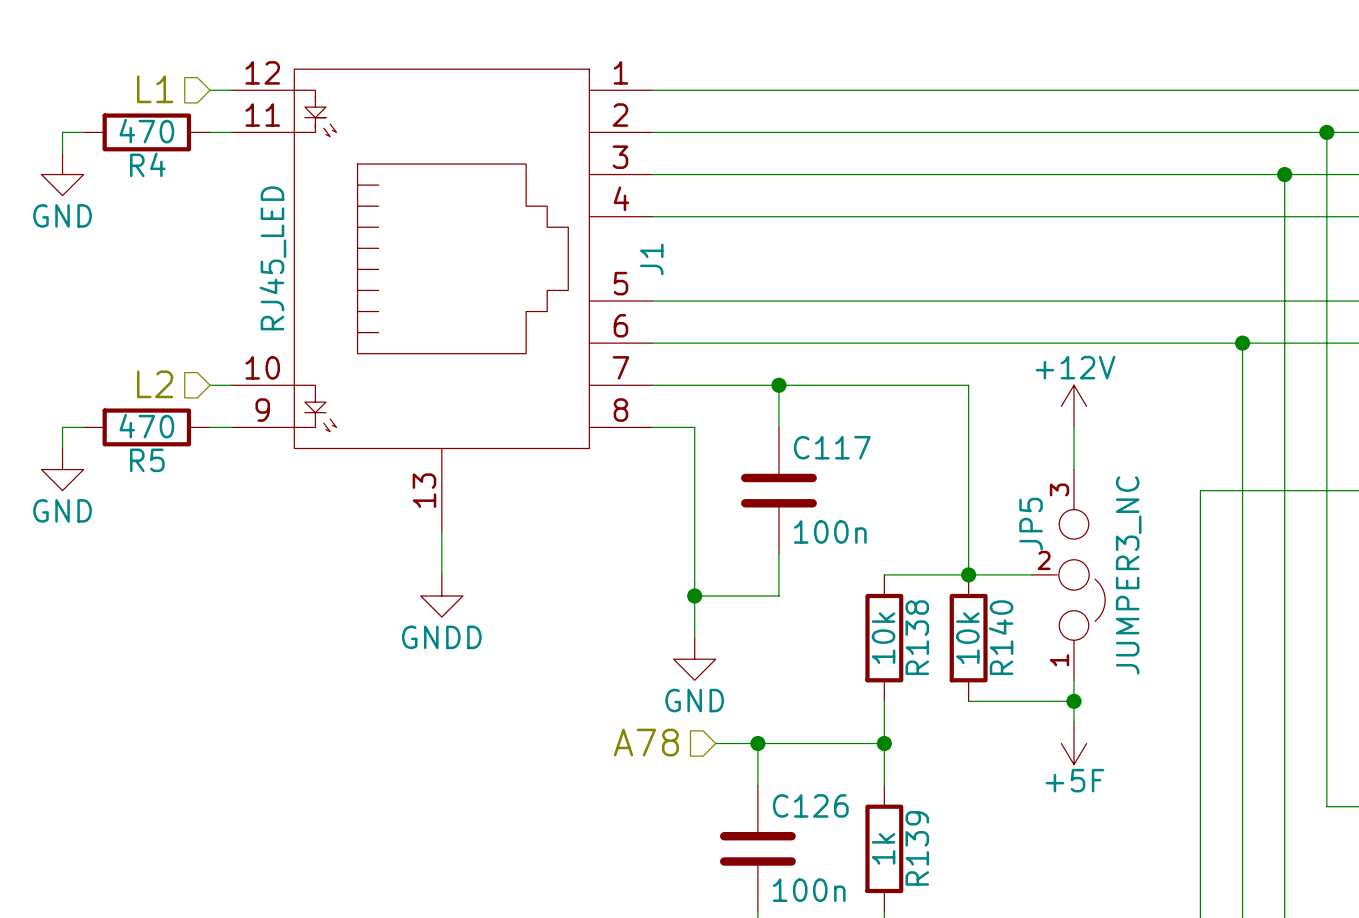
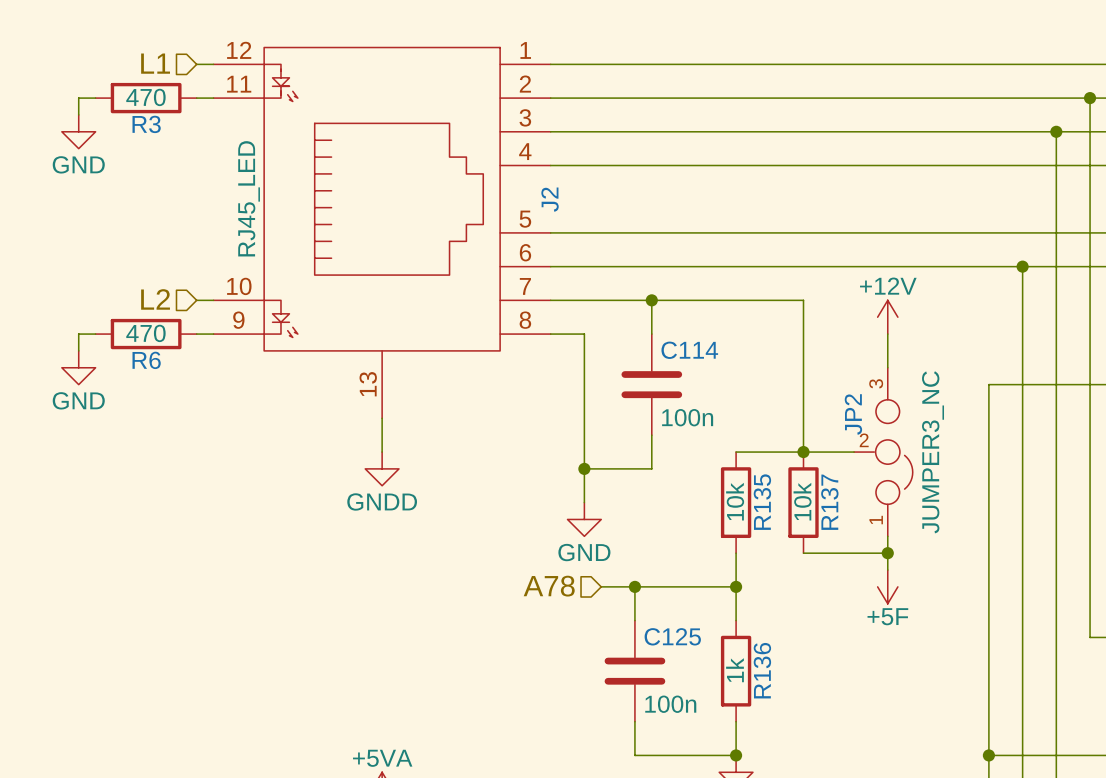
R4 name: R4 (147, 164) -> R3 (146, 124)
J1 name: J1 (651, 259) -> J2 (550, 199)
C117 name: C117 (832, 447) -> C114 (689, 350)
R5 name: R5 (147, 460) -> R6 (146, 360)
JP5 name: JP5 (1031, 524) -> JP2 (853, 414)
R138 name: R138 (917, 637) -> R135 (762, 502)
R140 name: R140 (1001, 637) -> R137 (829, 502)
C126 name: C126 (810, 805) -> C125 (672, 636)
R139 name: R139 (917, 848) -> R136 (762, 670)

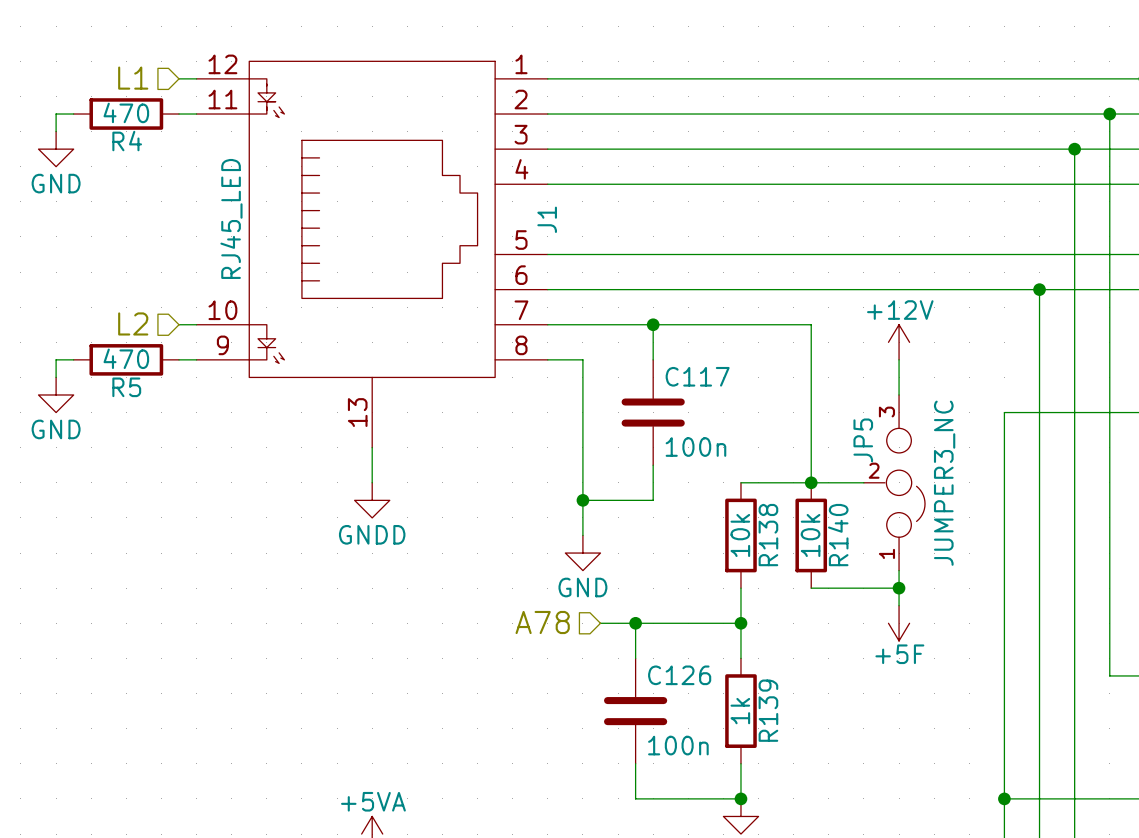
R3 name: R3 (146, 124) -> R4 (127, 141)
J2 name: J2 (550, 199) -> J1 (547, 219)
C114 name: C114 (689, 350) -> C117 (697, 376)
R6 name: R6 (146, 360) -> R5 (126, 387)
JP2 name: JP2 (853, 414) -> JP5 (863, 440)
R135 name: R135 (762, 502) -> R138 (768, 535)
R137 name: R137 (829, 502) -> R140 (838, 535)
C125 name: C125 (672, 636) -> C126 (679, 675)
R136 name: R136 (762, 670) -> R139 (768, 710)

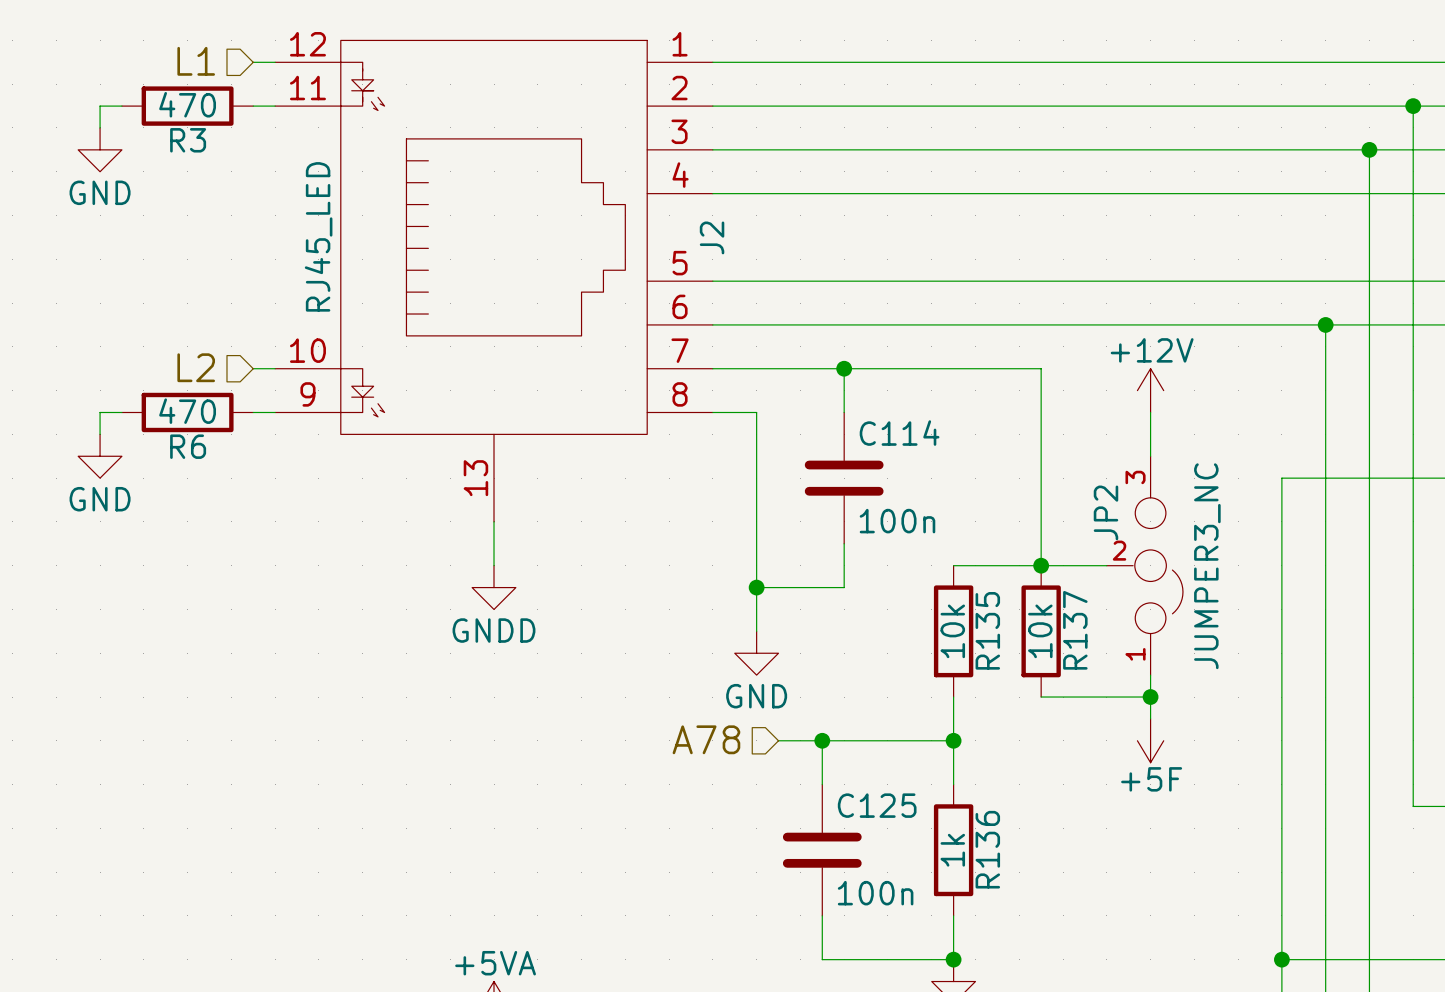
R4 name: R4 (127, 141) -> R3 (188, 140)
J1 name: J1 (547, 219) -> J2 (712, 237)
C117 name: C117 (697, 376) -> C114 (899, 433)
R5 name: R5 (126, 387) -> R6 (188, 446)
JP5 name: JP5 (863, 440) -> JP2 (1105, 512)
R138 name: R138 (768, 535) -> R135 (987, 630)
R140 name: R140 (838, 535) -> R137 (1075, 630)
C126 name: C126 (679, 675) -> C125 (877, 805)
R139 name: R139 (768, 710) -> R136 (987, 849)

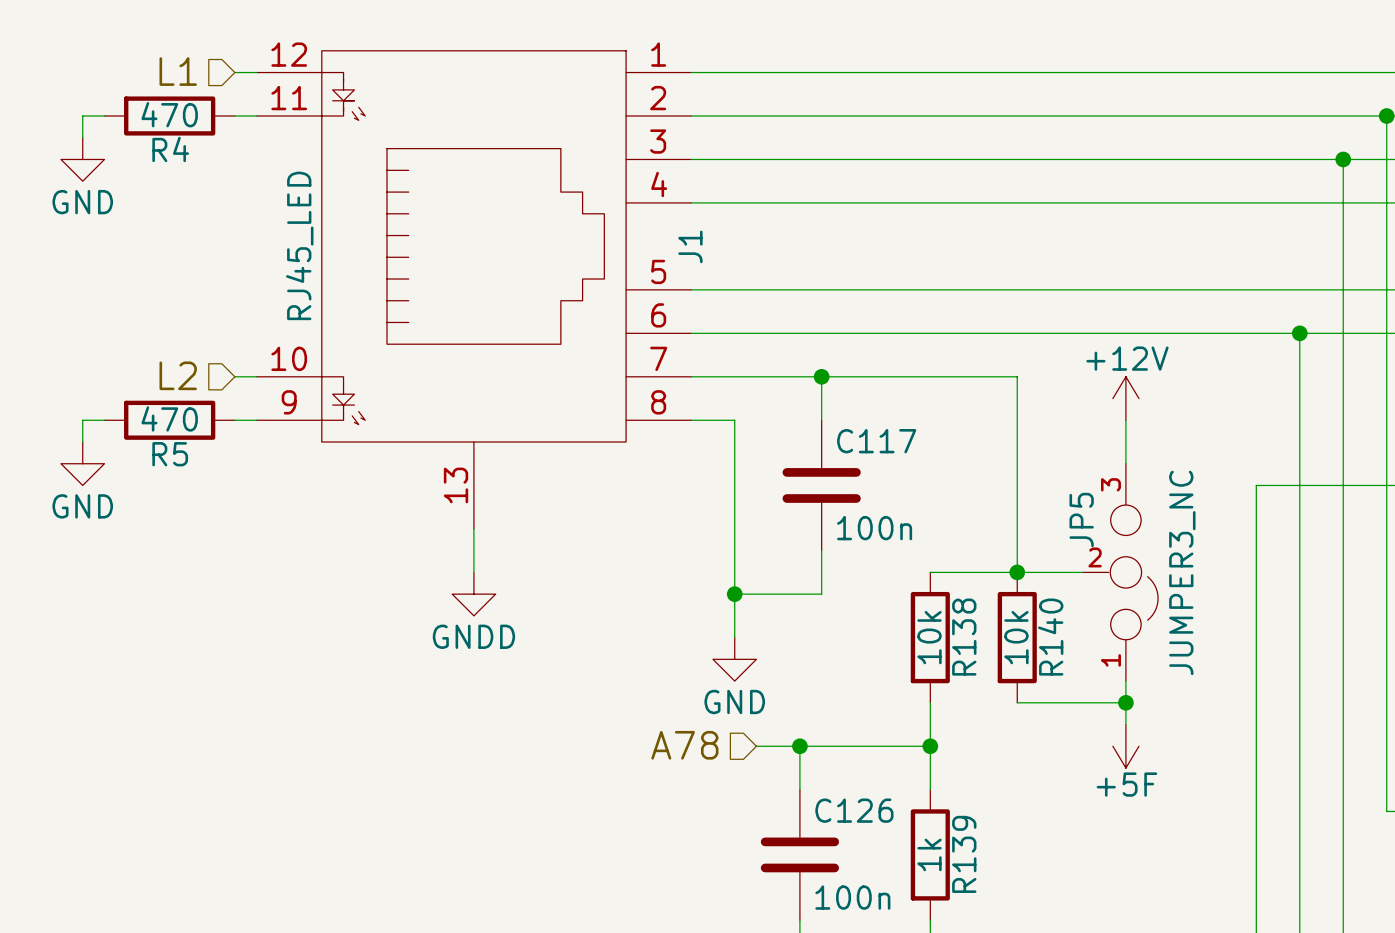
R3 name: R3 (188, 140) -> R4 (170, 149)
J2 name: J2 (712, 237) -> J1 (690, 246)
C114 name: C114 (899, 433) -> C117 (876, 441)
R6 name: R6 (188, 446) -> R5 (170, 454)
JP2 name: JP2 (1105, 512) -> JP5 (1081, 519)
R135 name: R135 (987, 630) -> R138 (964, 637)
R137 name: R137 (1075, 630) -> R140 (1050, 637)
C125 name: C125 (877, 805) -> C126 (854, 810)
R136 name: R136 (987, 849) -> R139 (964, 854)

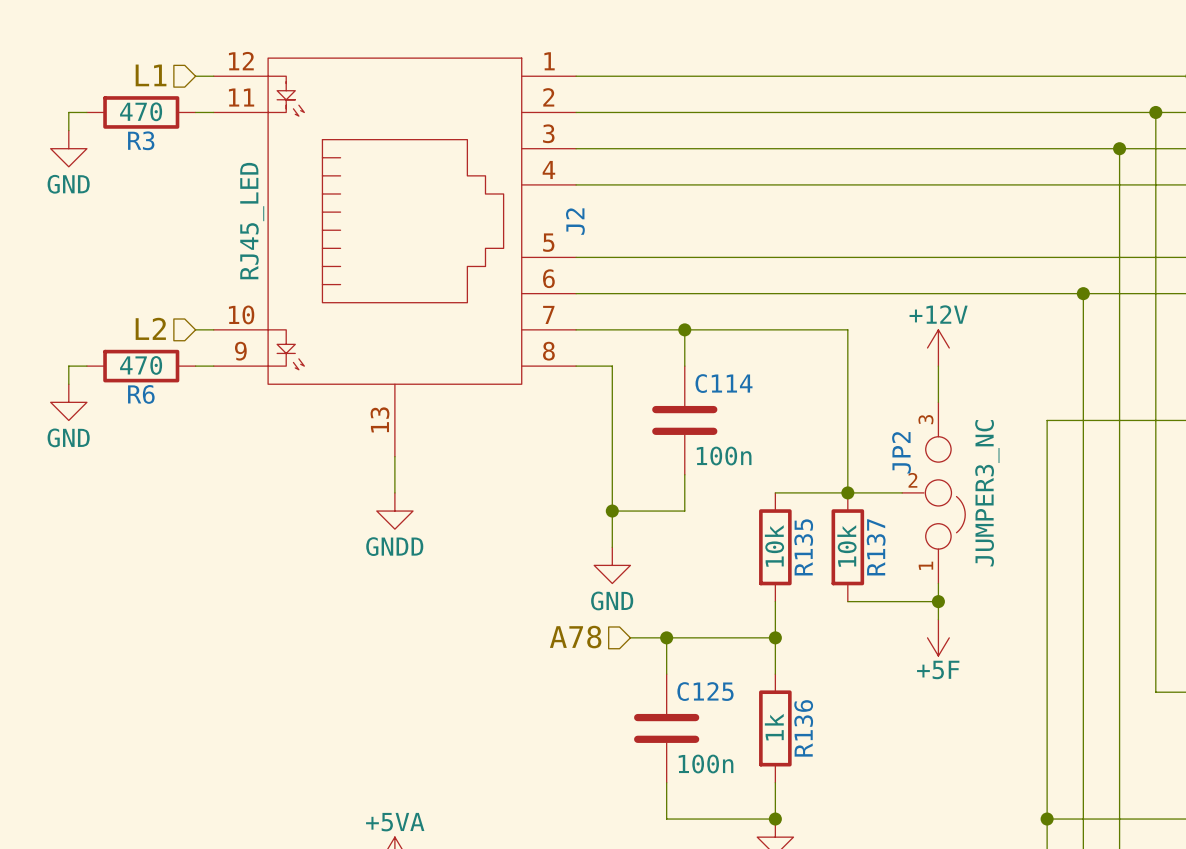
R4 name: R4 (170, 149) -> R3 (141, 140)
J1 name: J1 (690, 246) -> J2 (575, 221)
C117 name: C117 (876, 441) -> C114 (724, 383)
R5 name: R5 (170, 454) -> R6 (141, 394)
JP5 name: JP5 (1081, 519) -> JP2 (901, 452)
R138 name: R138 (964, 637) -> R135 (803, 547)
R140 name: R140 (1050, 637) -> R137 (876, 547)
C126 name: C126 (854, 810) -> C125 (705, 691)
R139 name: R139 (964, 854) -> R136 (803, 728)

